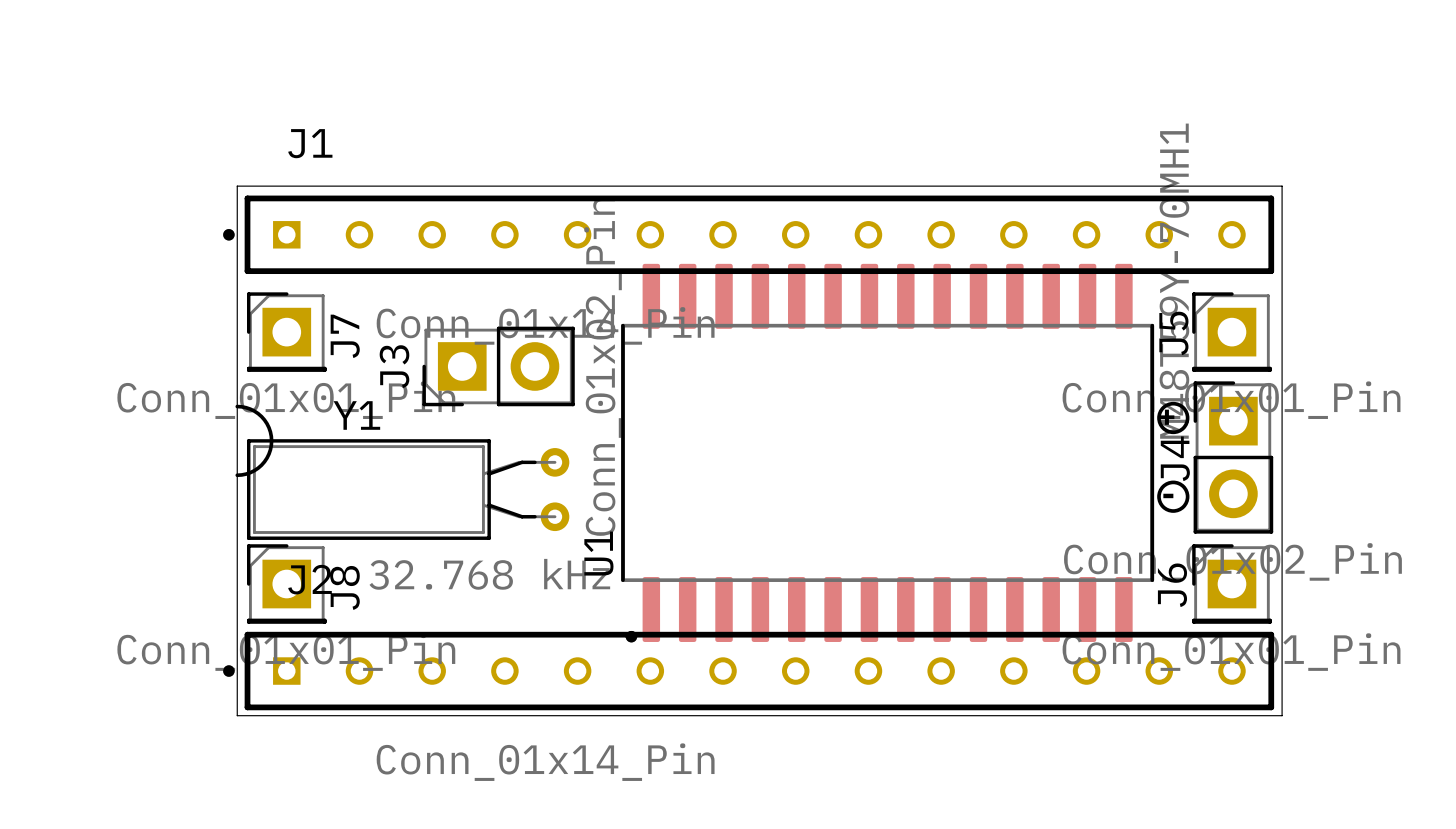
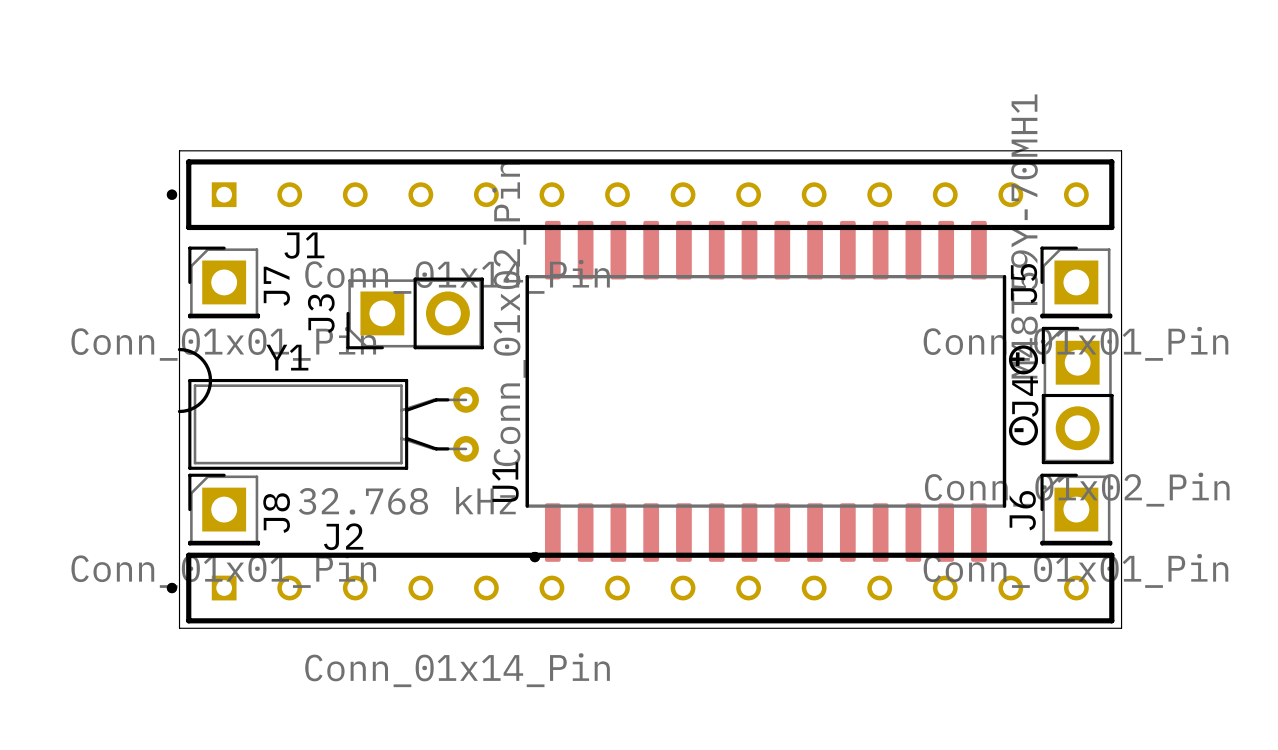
J1 name position: J1 (310, 143) -> J1 (304, 245)
J2 name position: J2 (310, 579) -> J2 (343, 536)

